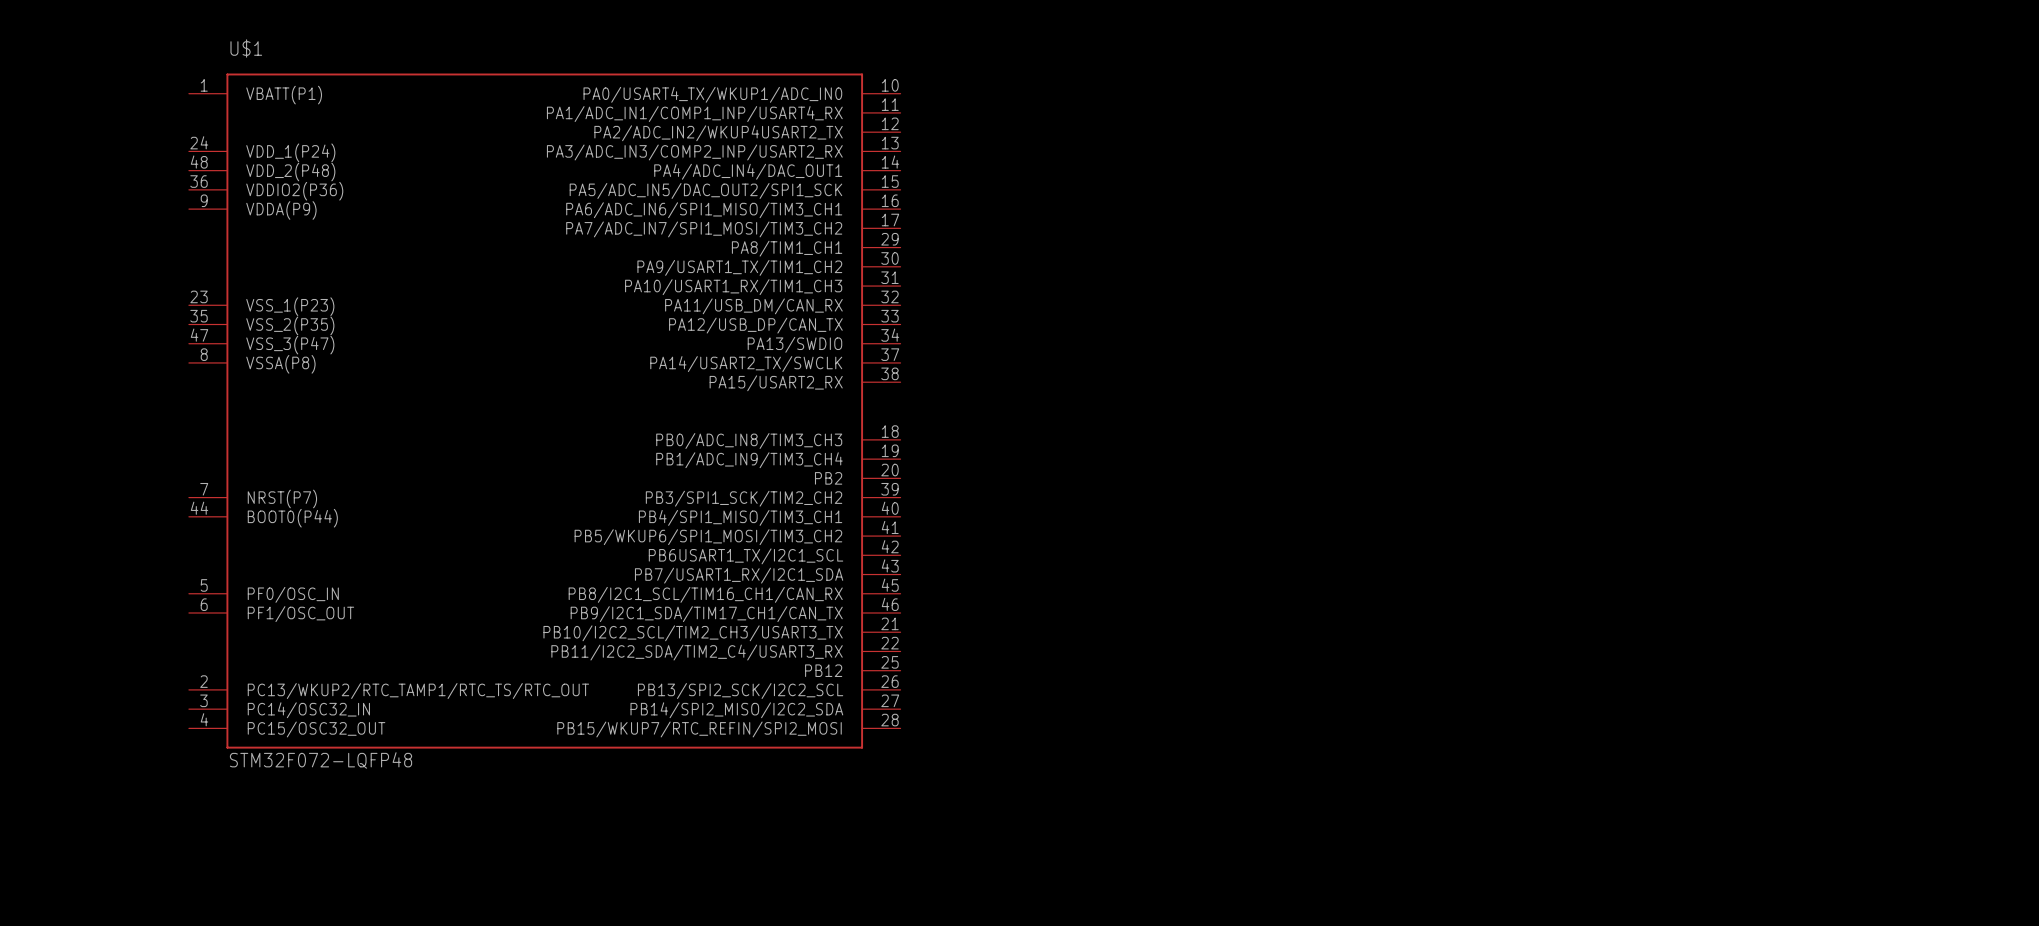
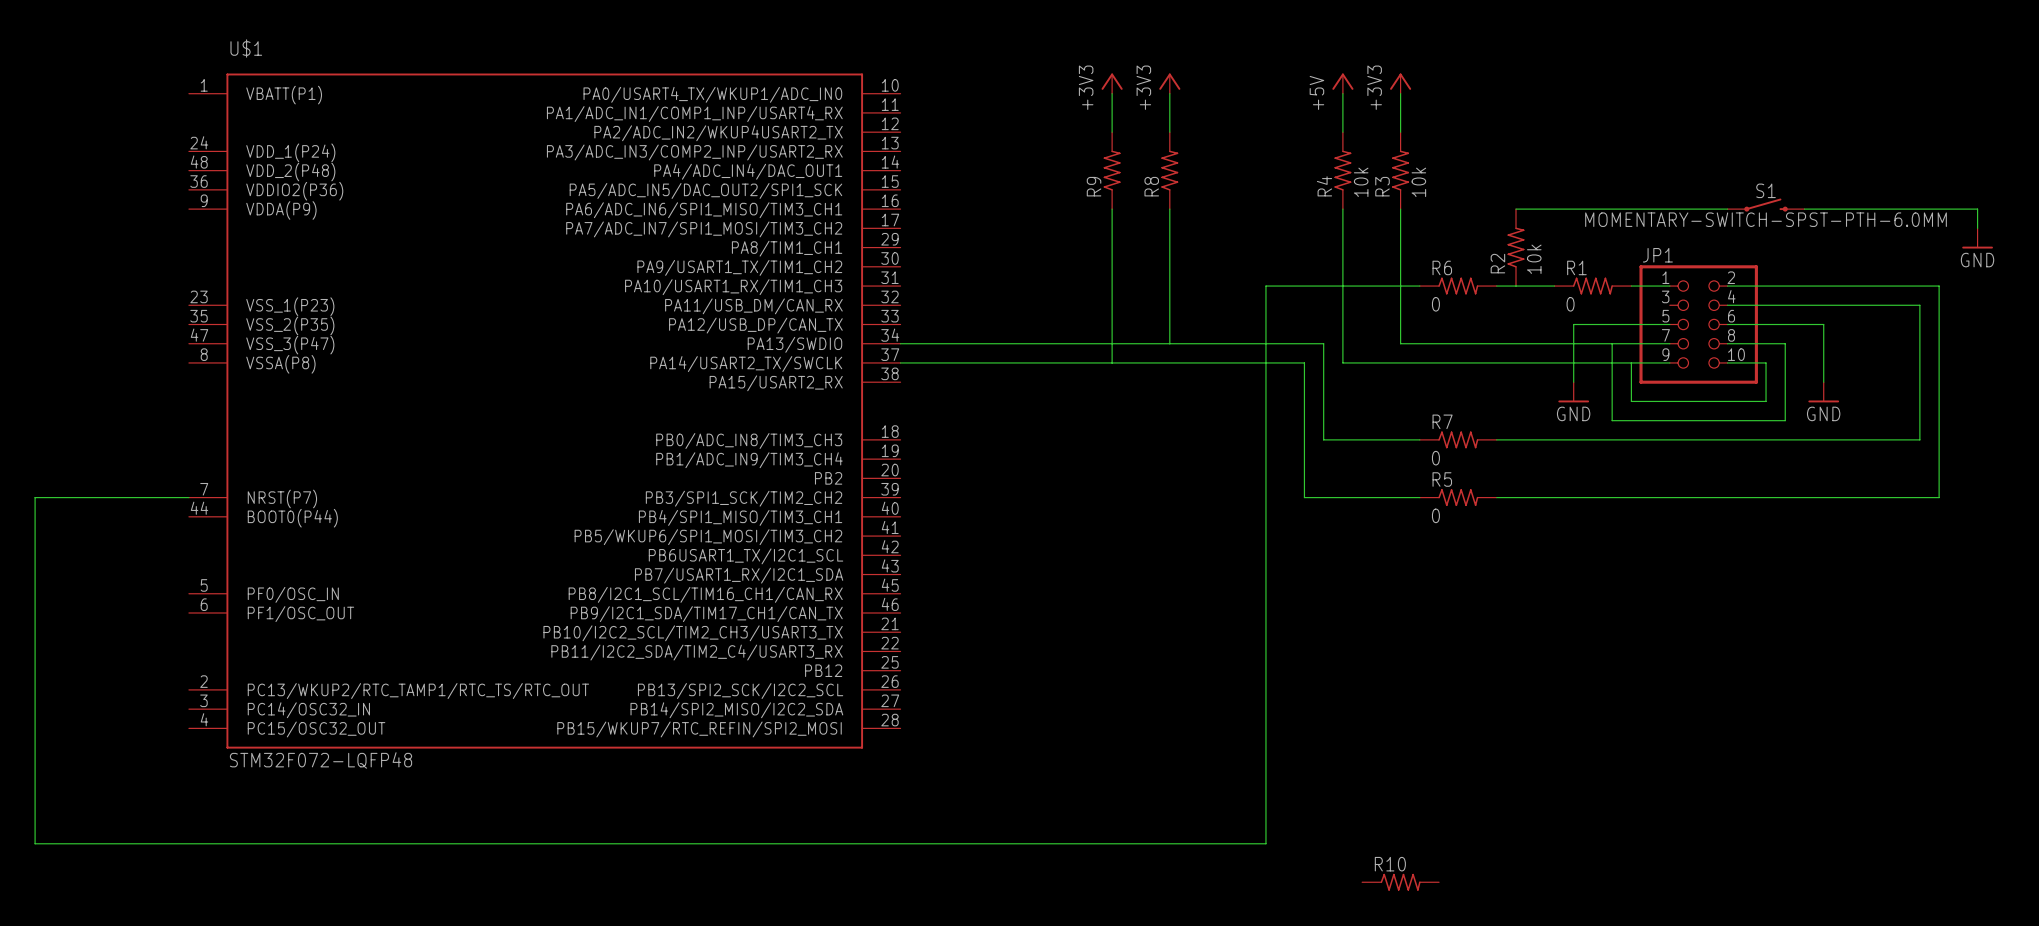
power symbol: none -> +3V3 (1112, 83)
power symbol: none -> +3V3 (1169, 83)
power symbol: none -> +5V (1342, 83)
power symbol: none -> +3V3 (1400, 83)
wire: none -> (1112, 93) (1112, 132)
wire: none -> (1169, 93) (1169, 132)
wire: none -> (1342, 93) (1342, 132)
wire: none -> (1400, 93) (1400, 132)
R9: none -> (1112, 170)
R8: none -> (1169, 170)
R4: none -> 10k (1342, 170)
R3: none -> 10k (1400, 170)
S1: none -> MOMENTARY-SWITCH-SPST-PTH-6.0MM (1766, 205)
wire: none -> (1112, 209) (1112, 362)
wire: none -> (1169, 209) (1169, 343)
wire: none -> (1342, 209) (1342, 362) (1669, 362)
wire: none -> (1400, 209) (1400, 343) (1669, 343)
wire: none -> (1516, 209) (1727, 209)
wire: none -> (1804, 209) (1977, 209) (1977, 228)
power symbol: none -> GND (1977, 238)
R2: none -> 10k (1516, 247)
wire: none -> (1419, 286) (1265, 286) (1265, 843) (35, 843) (35, 497) (188, 497)
R6: none -> 0 (1458, 286)
wire: none -> (1496, 286) (1554, 286)
R1: none -> 0 (1592, 286)
wire: none -> (1631, 286) (1669, 286)
wire: none -> (1727, 286) (1939, 286) (1939, 497) (1496, 497)
wire: none -> (1727, 305) (1919, 305) (1919, 439) (1496, 439)
wire: none -> (1669, 324) (1573, 324) (1573, 382)
JP1: none -> (1698, 324)
wire: none -> (1727, 324) (1823, 324) (1823, 382)
wire: none -> (900, 343) (1323, 343) (1323, 439) (1419, 439)
wire: none -> (1612, 343) (1612, 420) (1785, 420) (1785, 343) (1727, 343)
wire: none -> (900, 362) (1304, 362) (1304, 497) (1419, 497)
wire: none -> (1631, 362) (1631, 401) (1766, 401) (1766, 362) (1727, 362)
power symbol: none -> GND (1573, 392)
power symbol: none -> GND (1823, 392)
R7: none -> 0 (1458, 439)
R5: none -> 0 (1458, 497)
R10: none -> (1400, 882)

